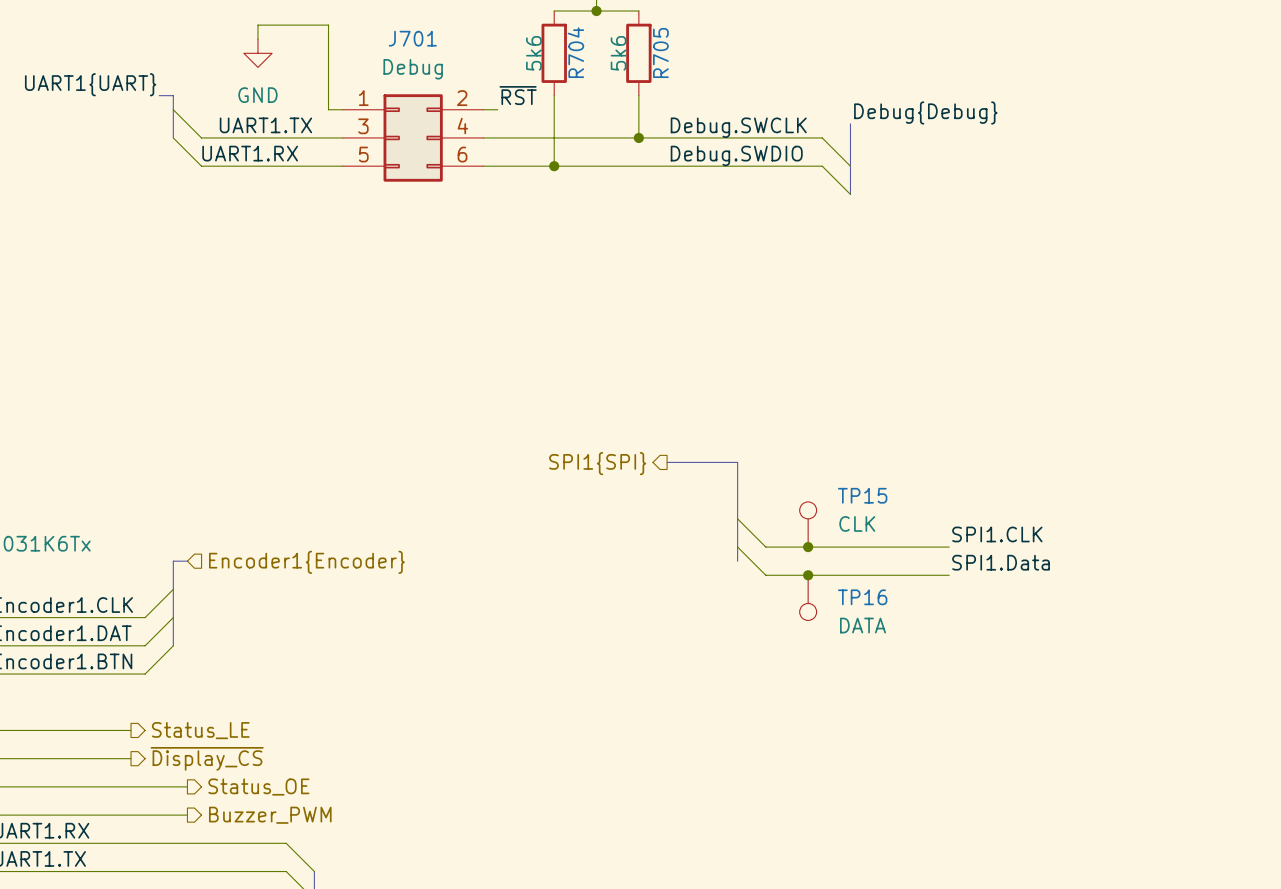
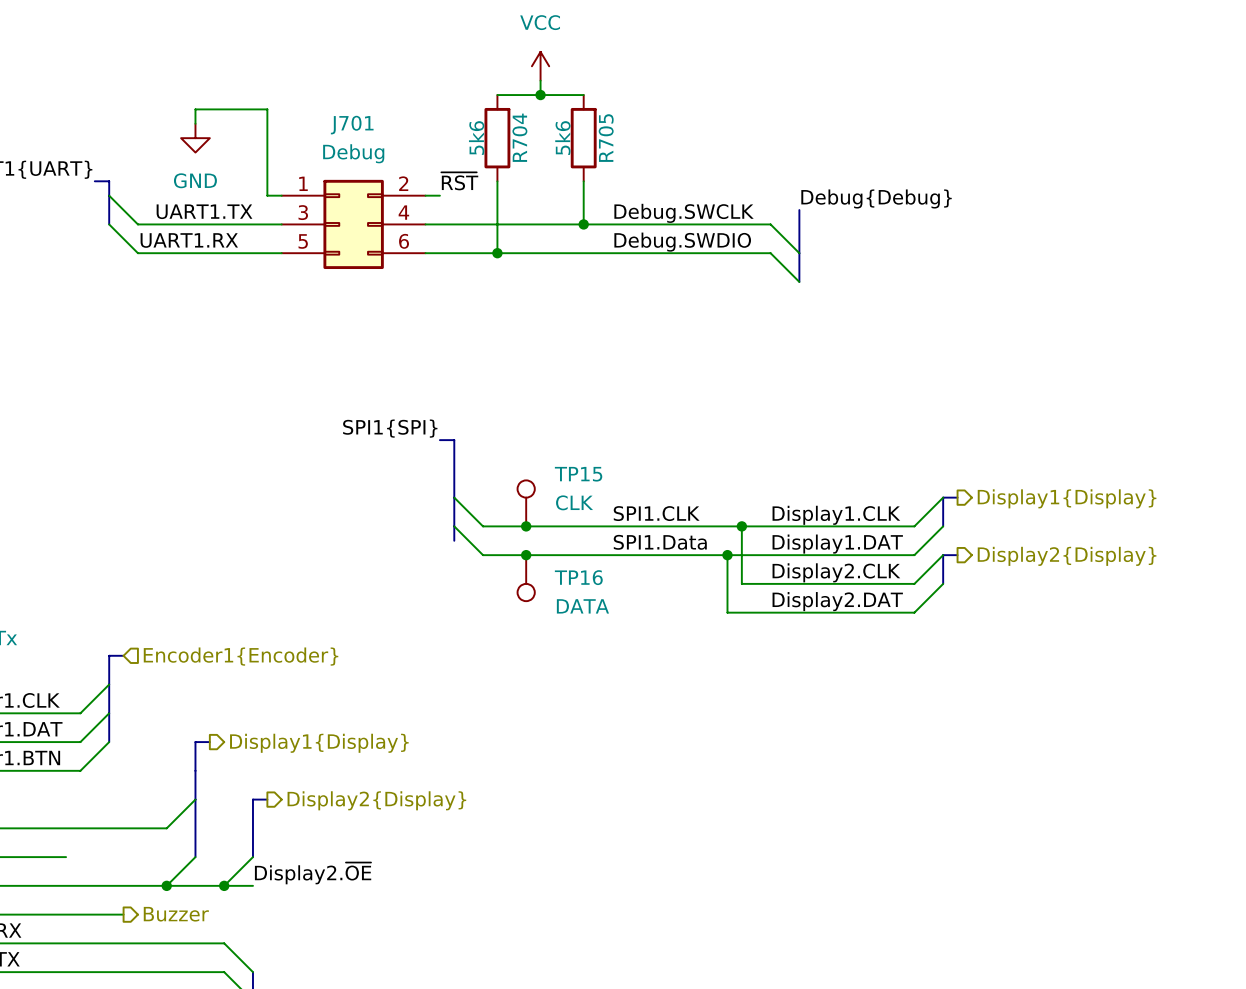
label: none -> SPI1{SPI} (390, 428)
bus: none -> (439, 440) (454, 440) (454, 540)
wire: none -> (454, 497) (483, 526) (914, 526) (943, 497)
bus: none -> (957, 497) (943, 497) (943, 526)
hierarchical label: none -> Display1{Display} (1067, 498)
label: none -> SPI1.CLK (656, 513)
label: none -> Display1.CLK (836, 515)
wire: none -> (454, 526) (483, 555) (914, 555) (943, 526)
junction: none -> (526, 526)
wire: none -> (741, 526) (741, 583) (914, 583) (943, 555)
junction: none -> (741, 526)
label: none -> SPI1.Data (660, 542)
label: none -> Display1.DAT (837, 544)
junction: none -> (526, 555)
bus: (667, 462) (737, 462) (737, 561) -> none
wire: none -> (727, 555) (727, 612) (914, 612) (943, 583)
junction: none -> (727, 555)
bus: none -> (957, 555) (943, 555) (943, 583)
hierarchical label: SPI1{SPI} (597, 463) -> none
hierarchical label: none -> Display2{Display} (1067, 556)
label: none -> Display2.CLK (836, 572)
label: none -> Display2.DAT (837, 601)
wire: (737, 518) (765, 547) (949, 547) -> none
TP15 position: (808, 524) -> (526, 503)
label: SPI1.CLK (997, 534) -> none
wire: (737, 547) (765, 575) (949, 575) -> none
junction: (808, 547) -> none
label: SPI1.Data (1001, 562) -> none
junction: (808, 575) -> none
TP16 position: (808, 597) -> (526, 578)
bus: none -> (209, 742) (195, 742) (195, 857)
hierarchical label: none -> Display1{Display} (319, 743)
wire: none -> (195, 799) (166, 828) (66, 828)
bus: none -> (267, 799) (252, 799) (252, 857)
hierarchical label: none -> Display2{Display} (376, 800)
hierarchical label: Status_LE (200, 730) -> none
hierarchical label: ~{Display_CS} (207, 758) -> none
wire: none -> (195, 857) (166, 885)
wire: none -> (252, 857) (224, 885)
label: none -> Display2.~{OE} (313, 873)
wire: none -> (123, 885) (252, 885)
junction: none -> (166, 885)
junction: none -> (224, 885)
hierarchical label: Status_OE (258, 787) -> none
hierarchical label: Buzzer_PWM (270, 815) -> Buzzer (176, 914)

